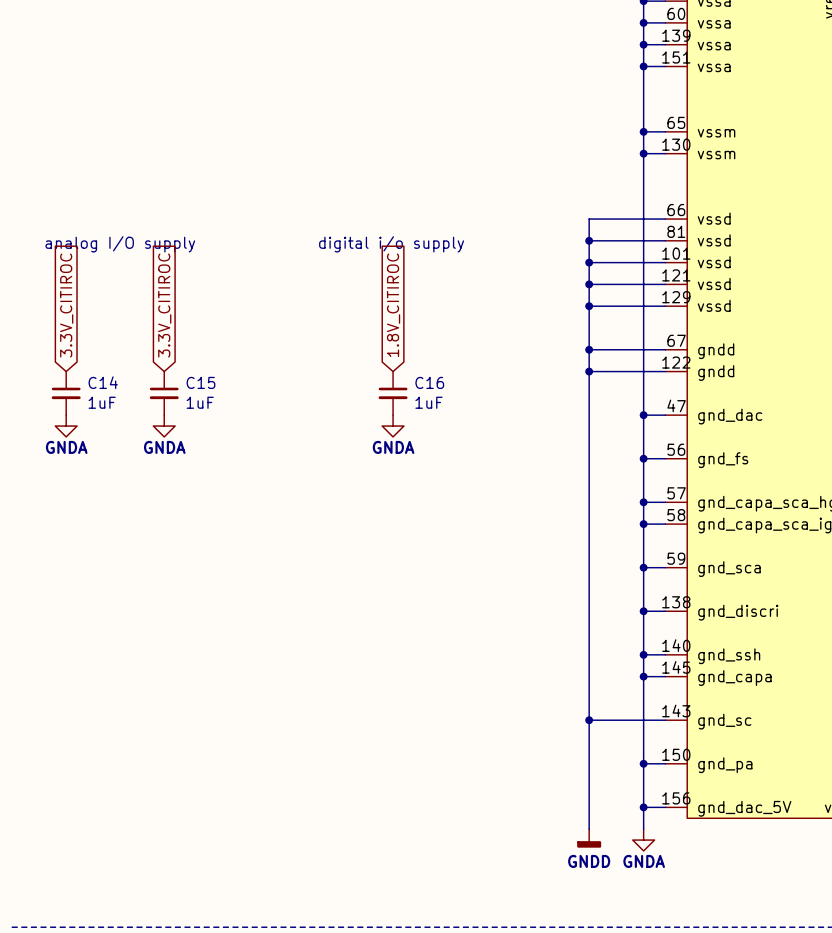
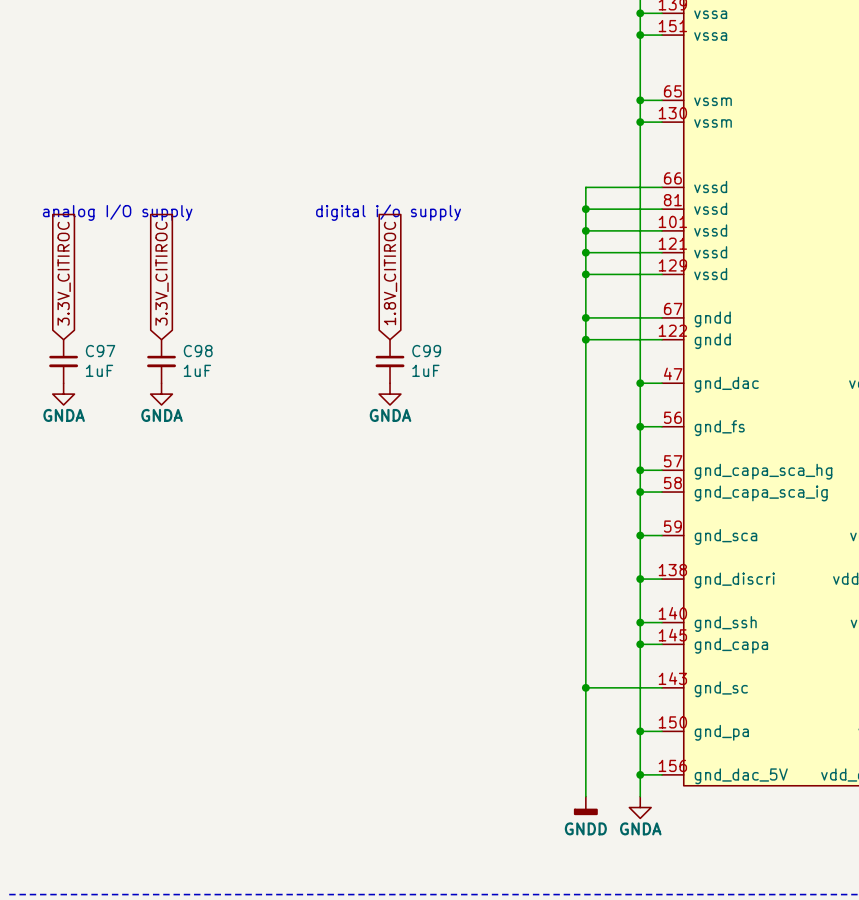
C14 name: C14 (103, 382) -> C97 (100, 351)
C15 name: C15 (200, 382) -> C98 (198, 351)
C16 name: C16 (429, 382) -> C99 (426, 351)

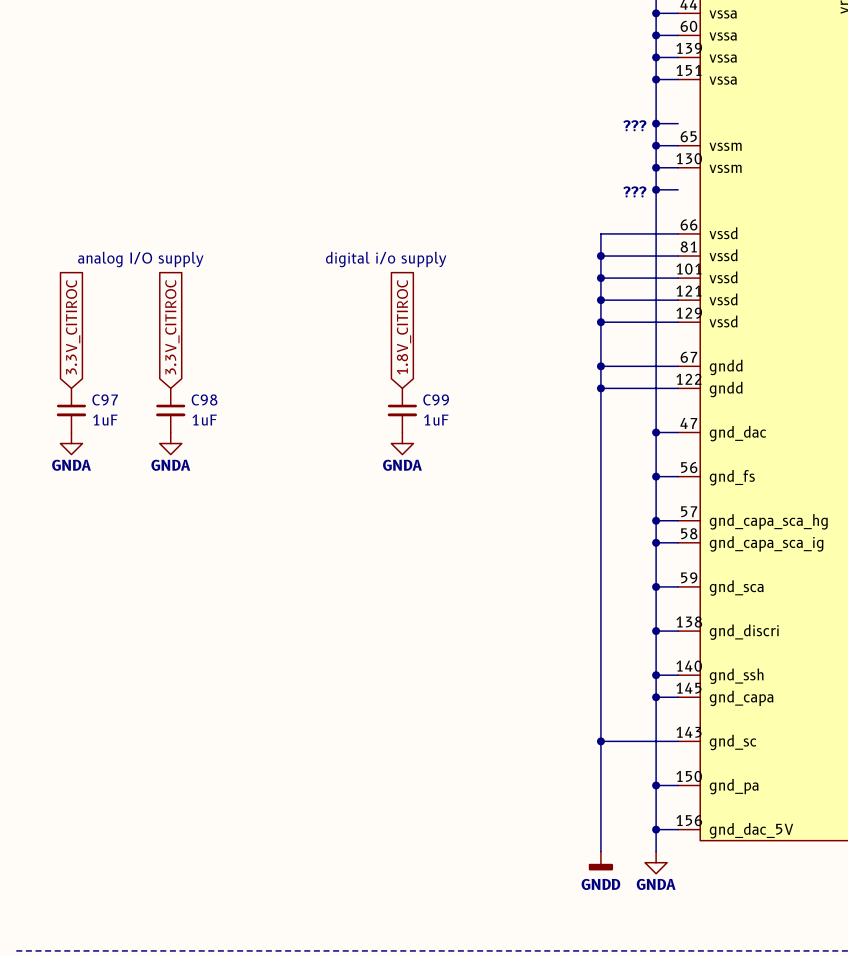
wire: none -> (656, 123) (678, 123)
junction: none -> (656, 123)
text: none -> ??? (634, 125)
wire: none -> (656, 189) (678, 189)
junction: none -> (656, 189)
text: none -> ??? (634, 191)

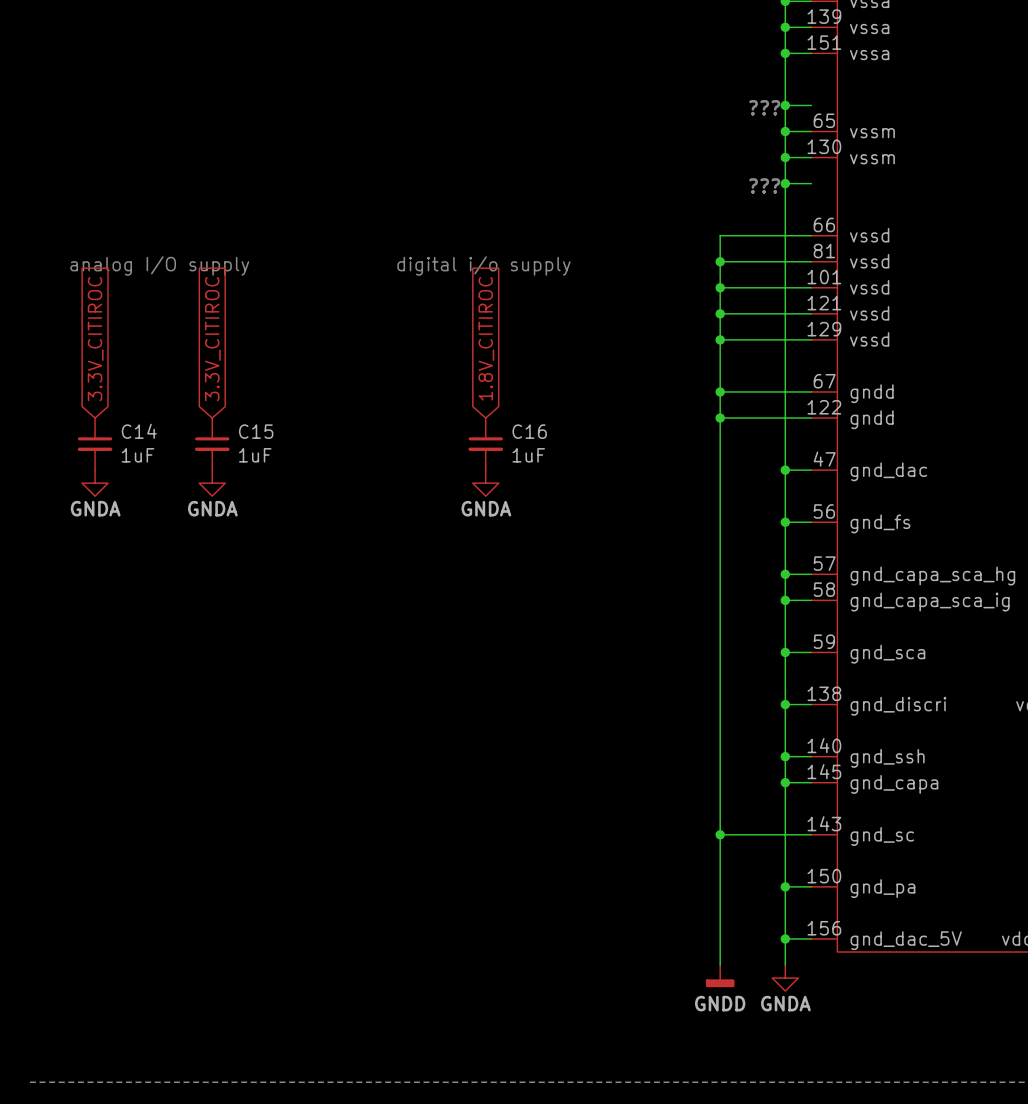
C97 name: C97 (105, 399) -> C14 (139, 431)
C98 name: C98 (204, 399) -> C15 (256, 431)
C99 name: C99 (436, 399) -> C16 (529, 431)

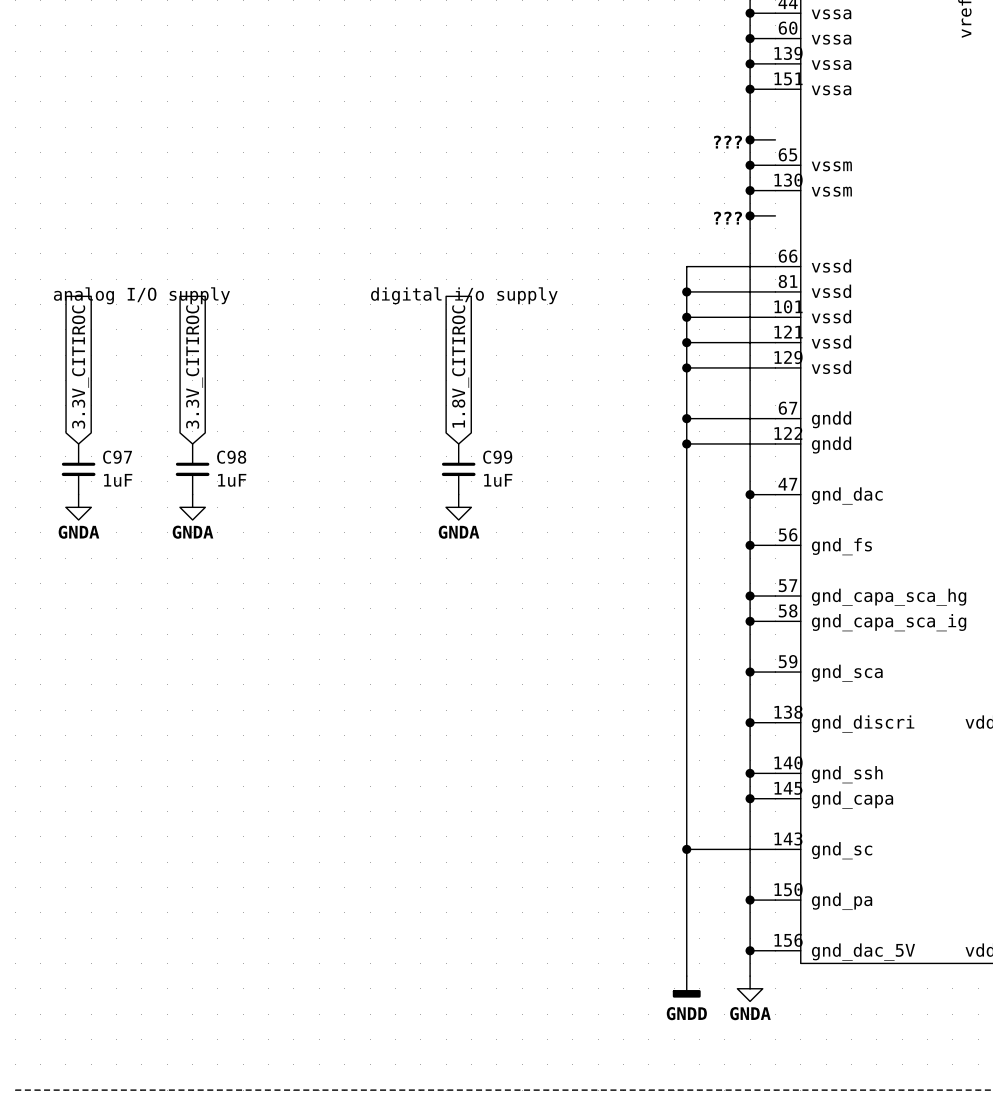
C14 name: C14 (139, 431) -> C97 (117, 457)
C15 name: C15 (256, 431) -> C98 (231, 457)
C16 name: C16 (529, 431) -> C99 (497, 457)

